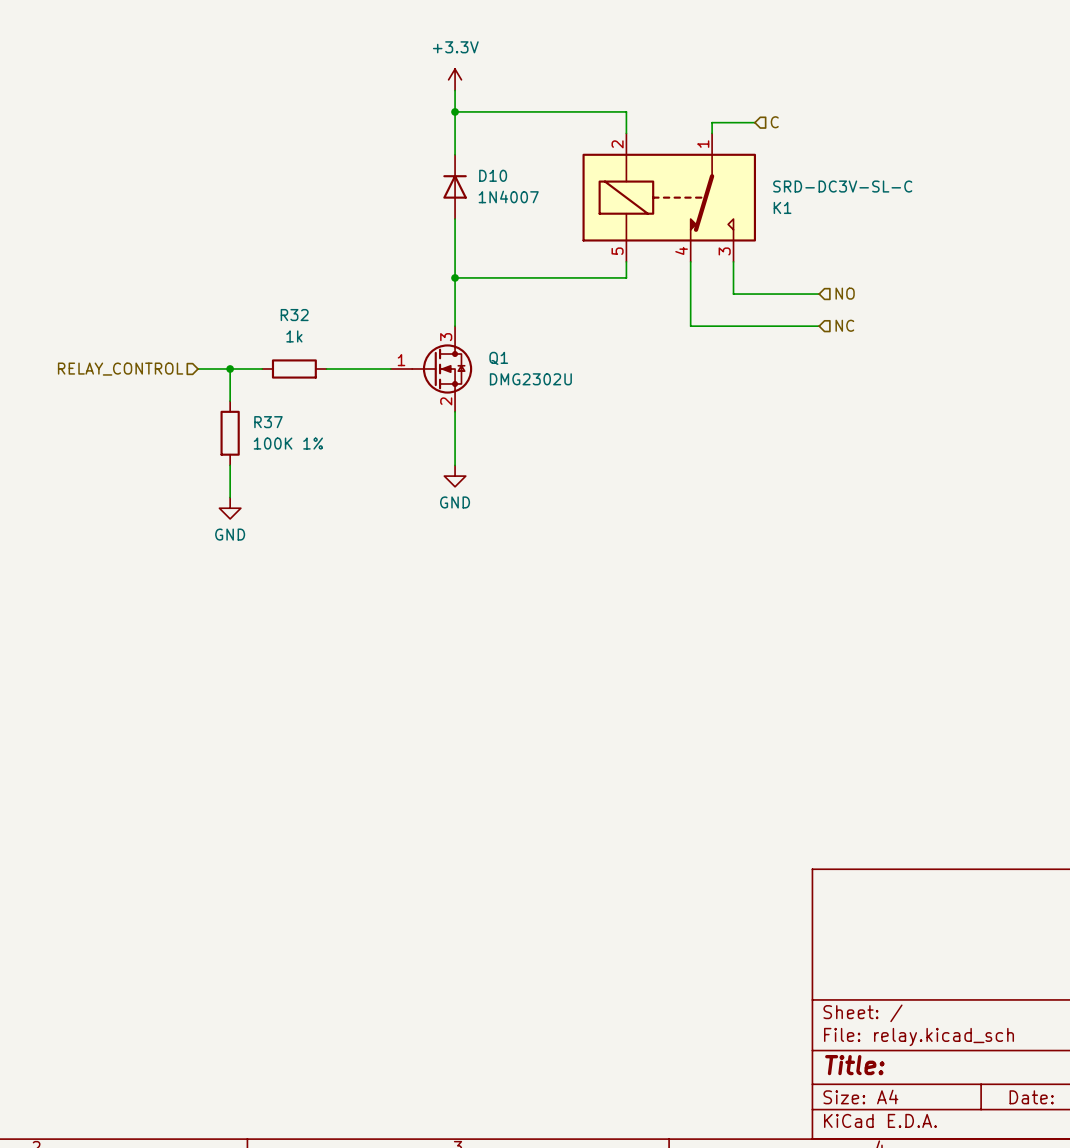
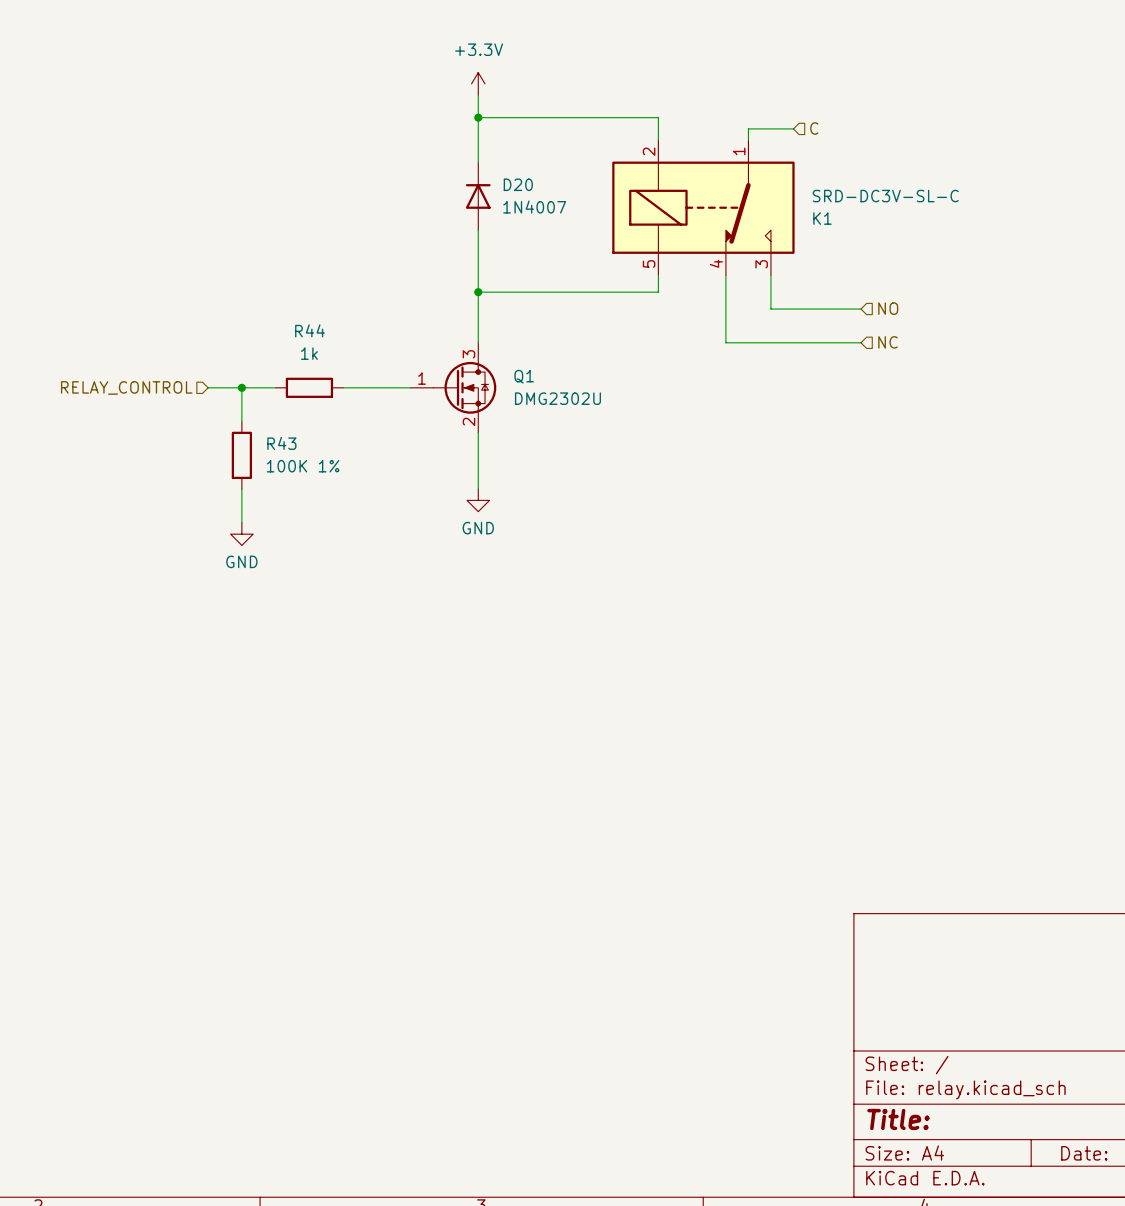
D10 name: D10 (493, 175) -> D20 (518, 184)
R32 name: R32 (294, 315) -> R44 (309, 330)
R37 name: R37 (268, 422) -> R43 (281, 443)

